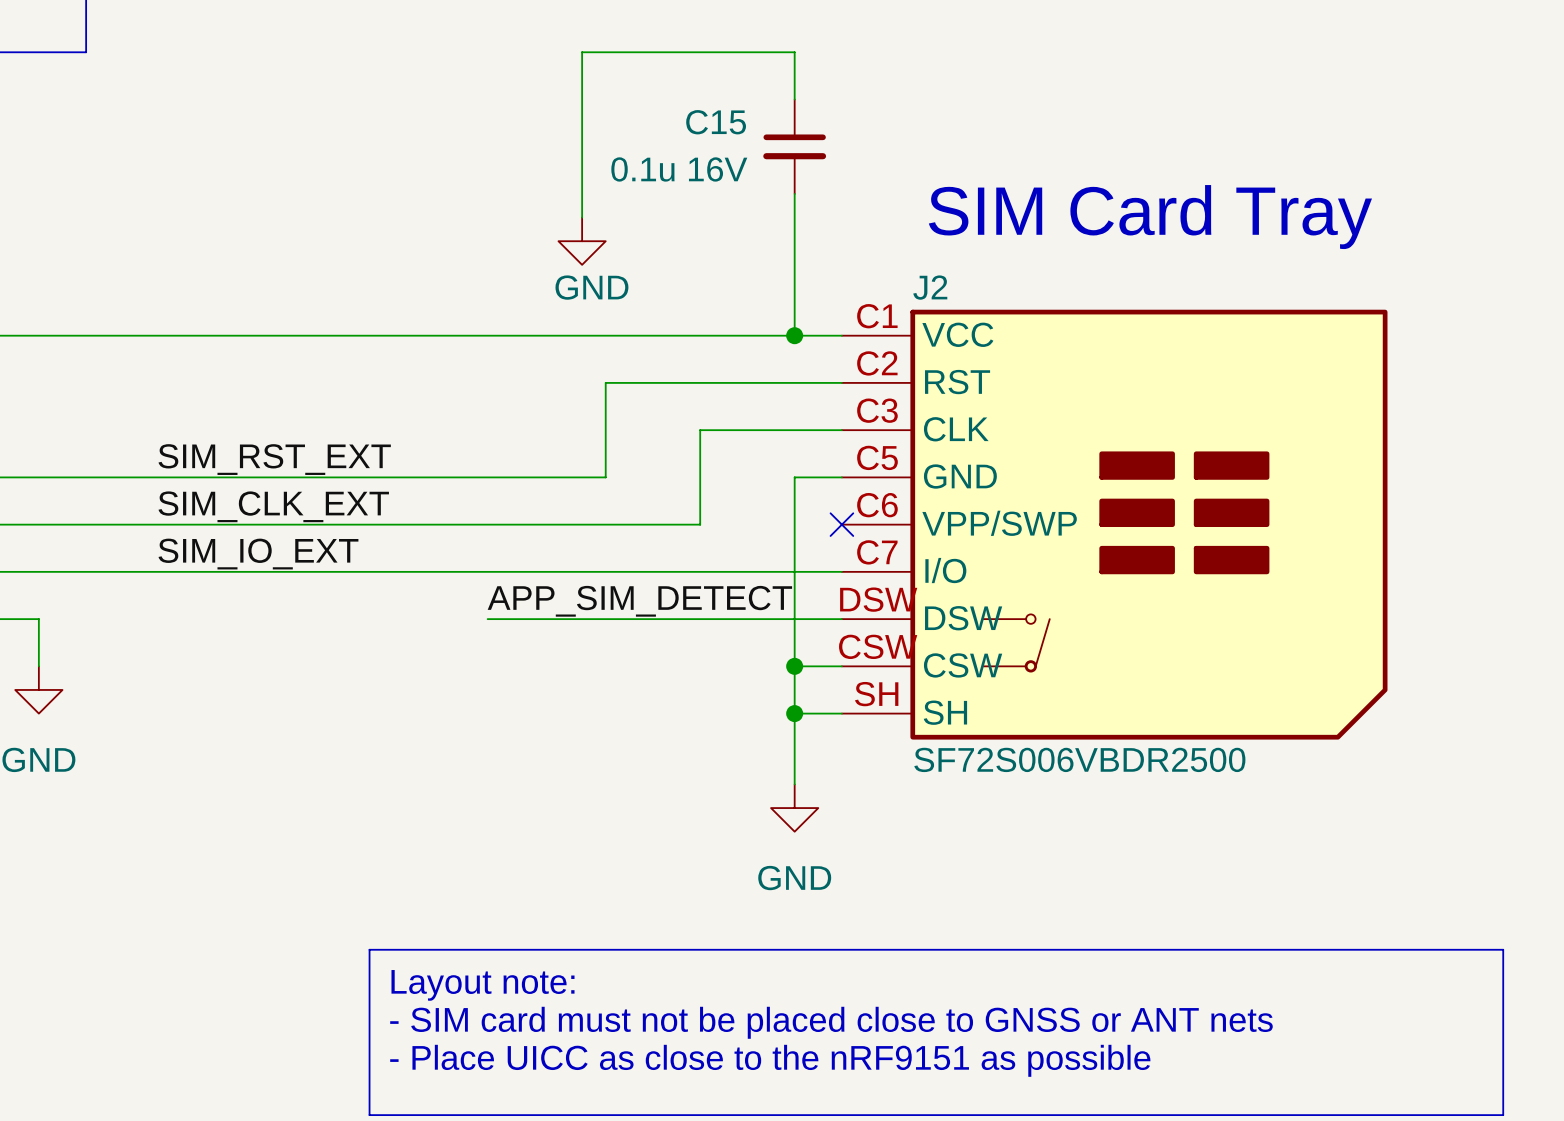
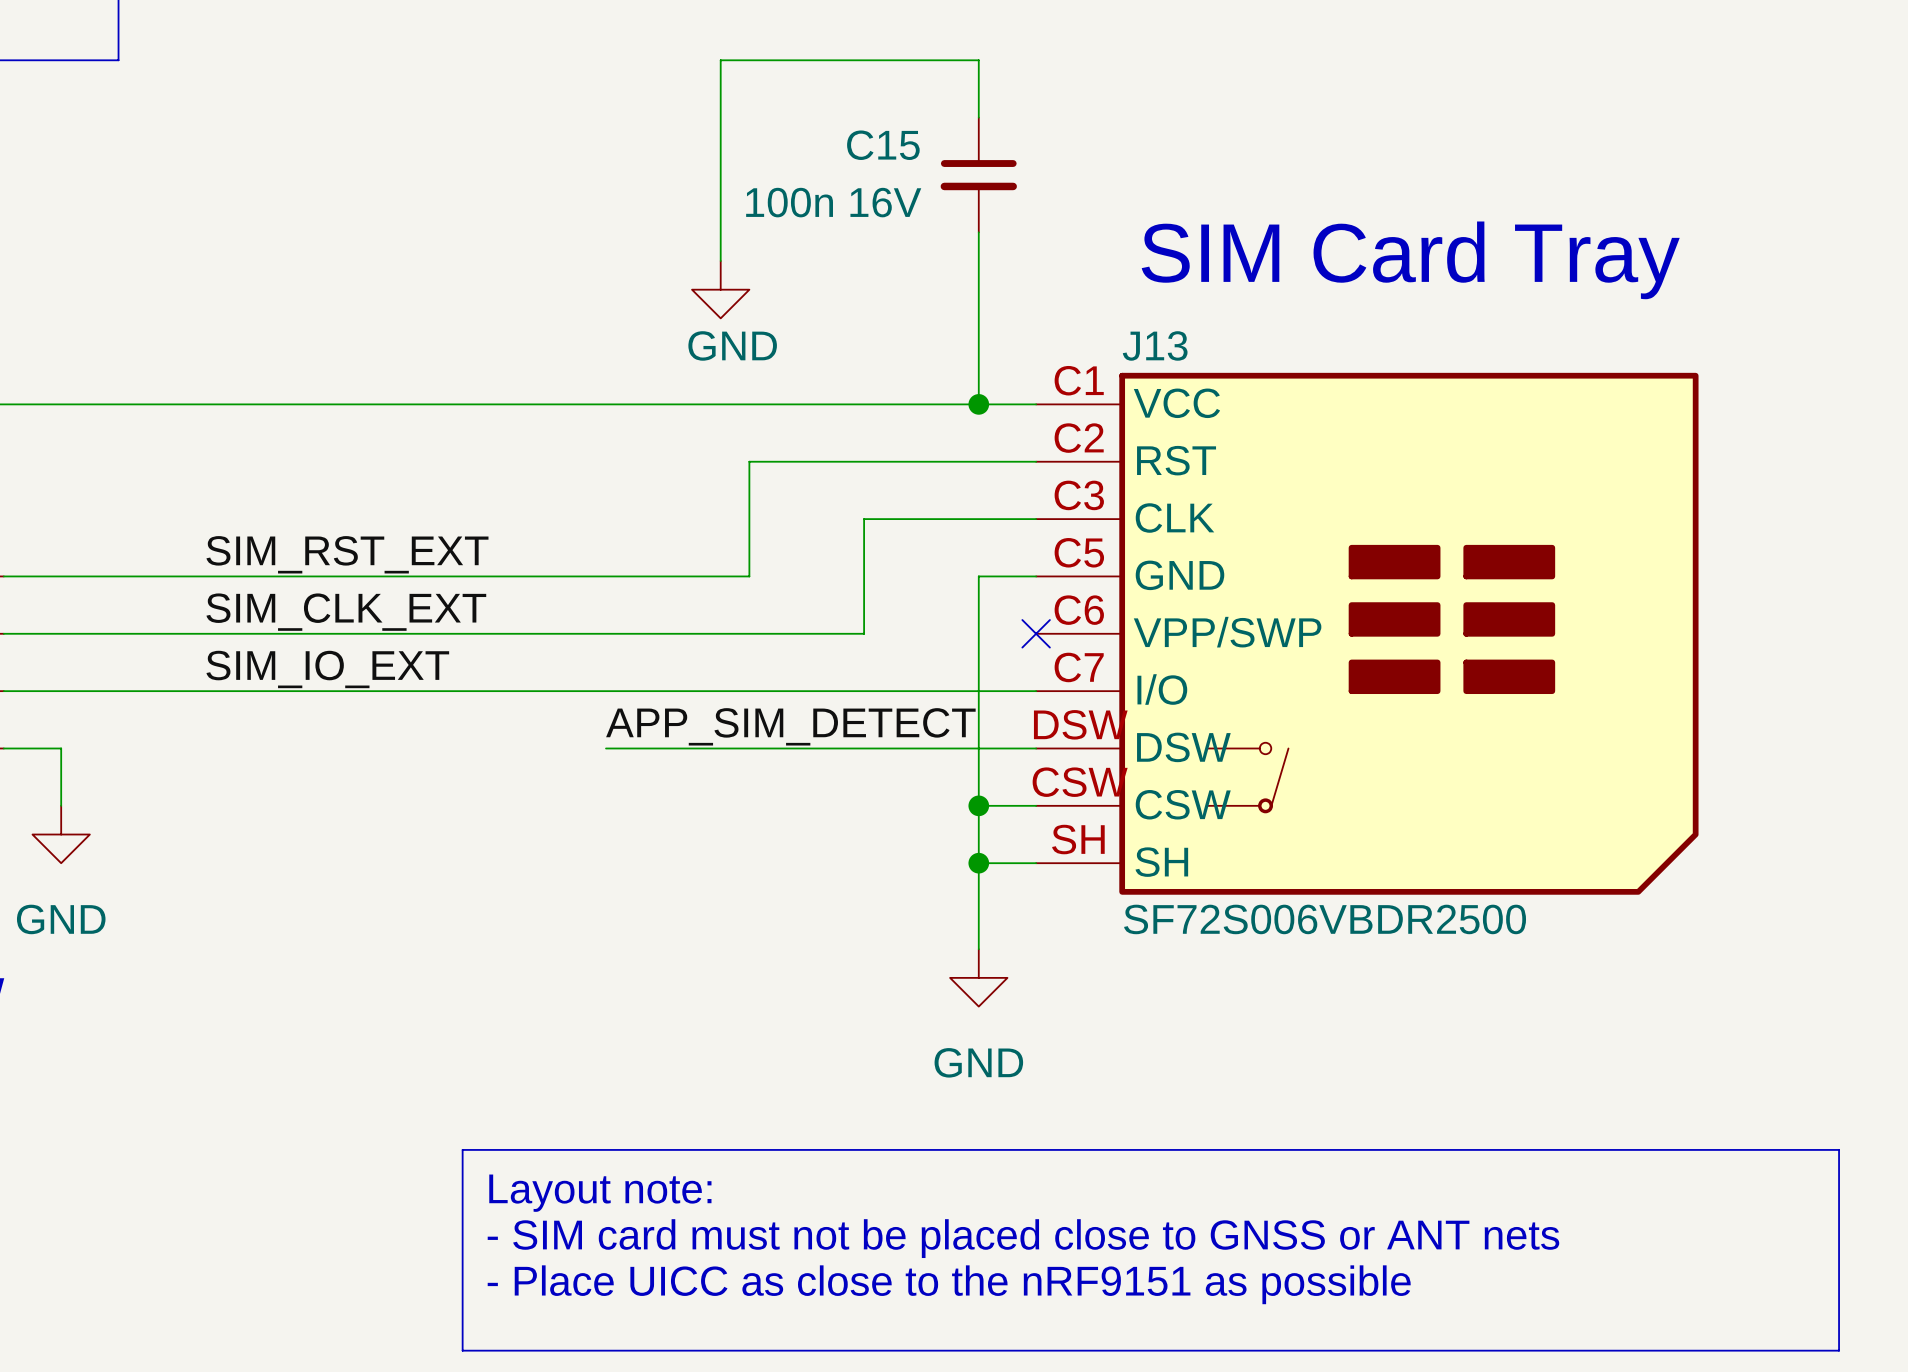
C15 value: 0.1u 16V (679, 169) -> 100n 16V (833, 202)
J2 name: J2 (930, 287) -> J13 (1155, 345)

